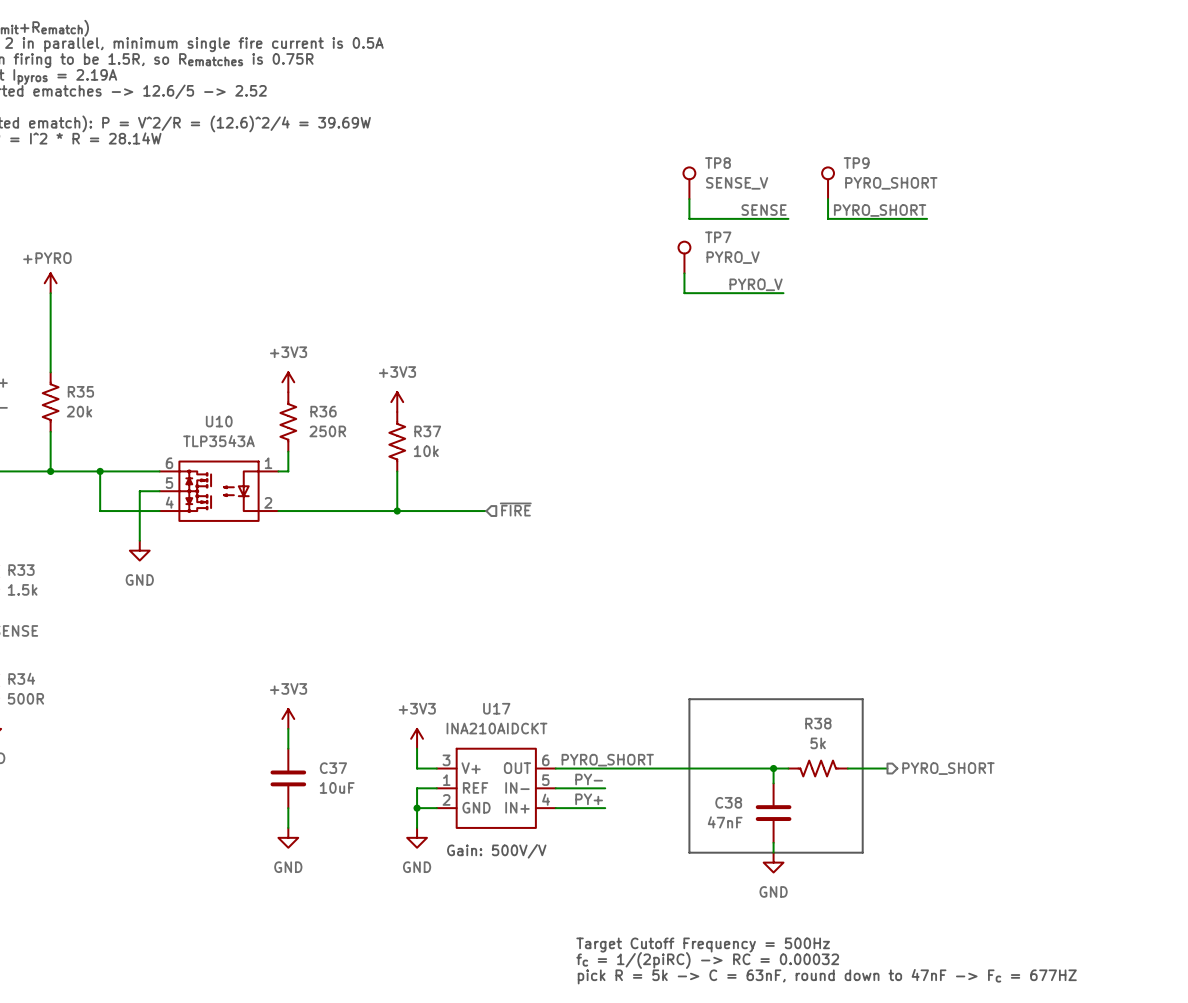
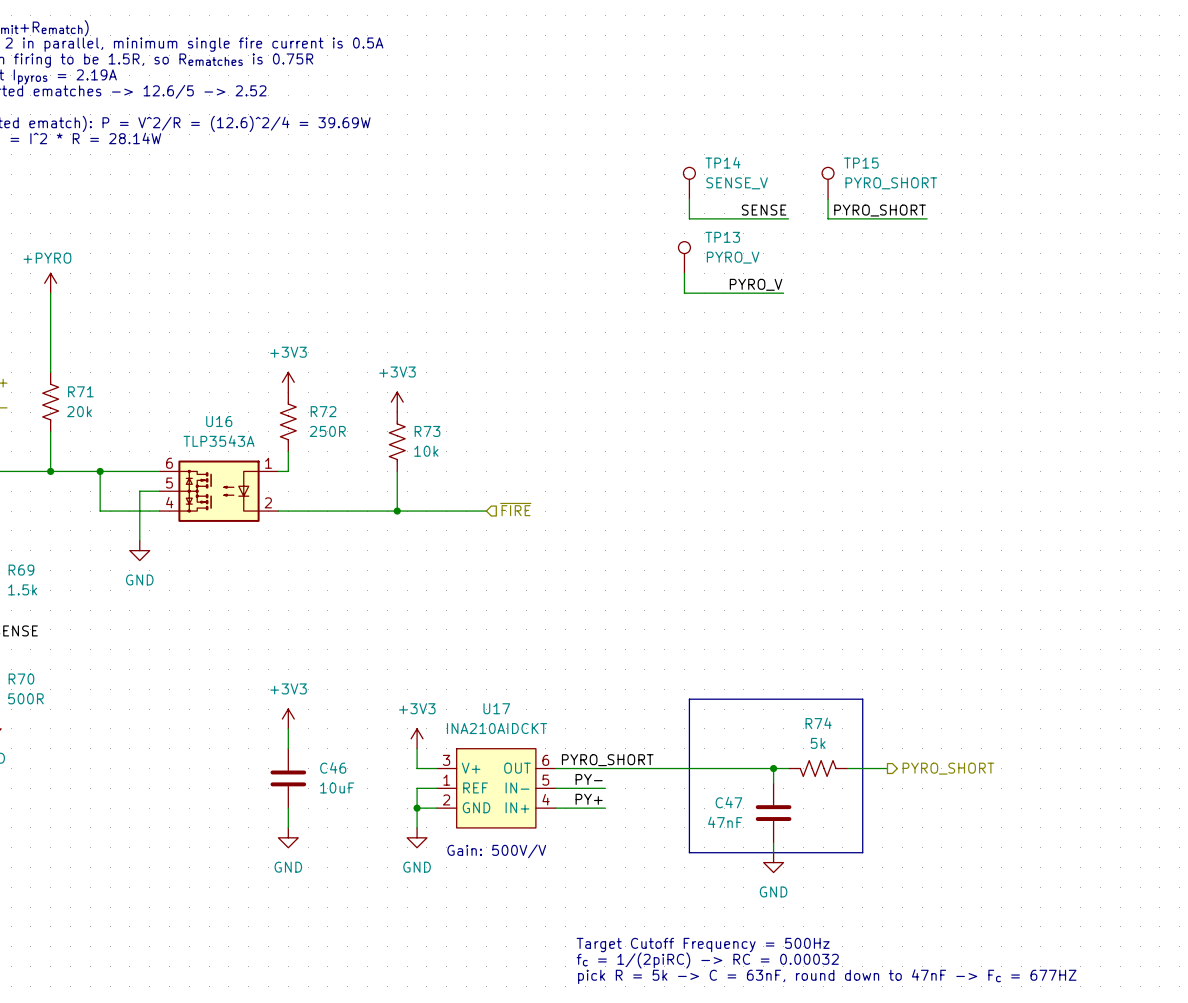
TP8 name: TP8 (718, 163) -> TP14 (722, 162)
TP9 name: TP9 (856, 163) -> TP15 (861, 163)
TP7 name: TP7 (718, 237) -> TP13 (722, 237)
R35 name: R35 (80, 391) -> R71 (80, 391)
R36 name: R36 (323, 411) -> R72 (323, 411)
U10 name: U10 (219, 421) -> U16 (219, 421)
R37 name: R37 (427, 431) -> R73 (427, 431)
R33 name: R33 (21, 570) -> R69 (21, 570)
R34 name: R34 (21, 678) -> R70 (21, 679)
R38 name: R38 (818, 723) -> R74 (818, 723)
C37 name: C37 (333, 768) -> C46 (333, 767)
C38 name: C38 (728, 802) -> C47 (728, 802)

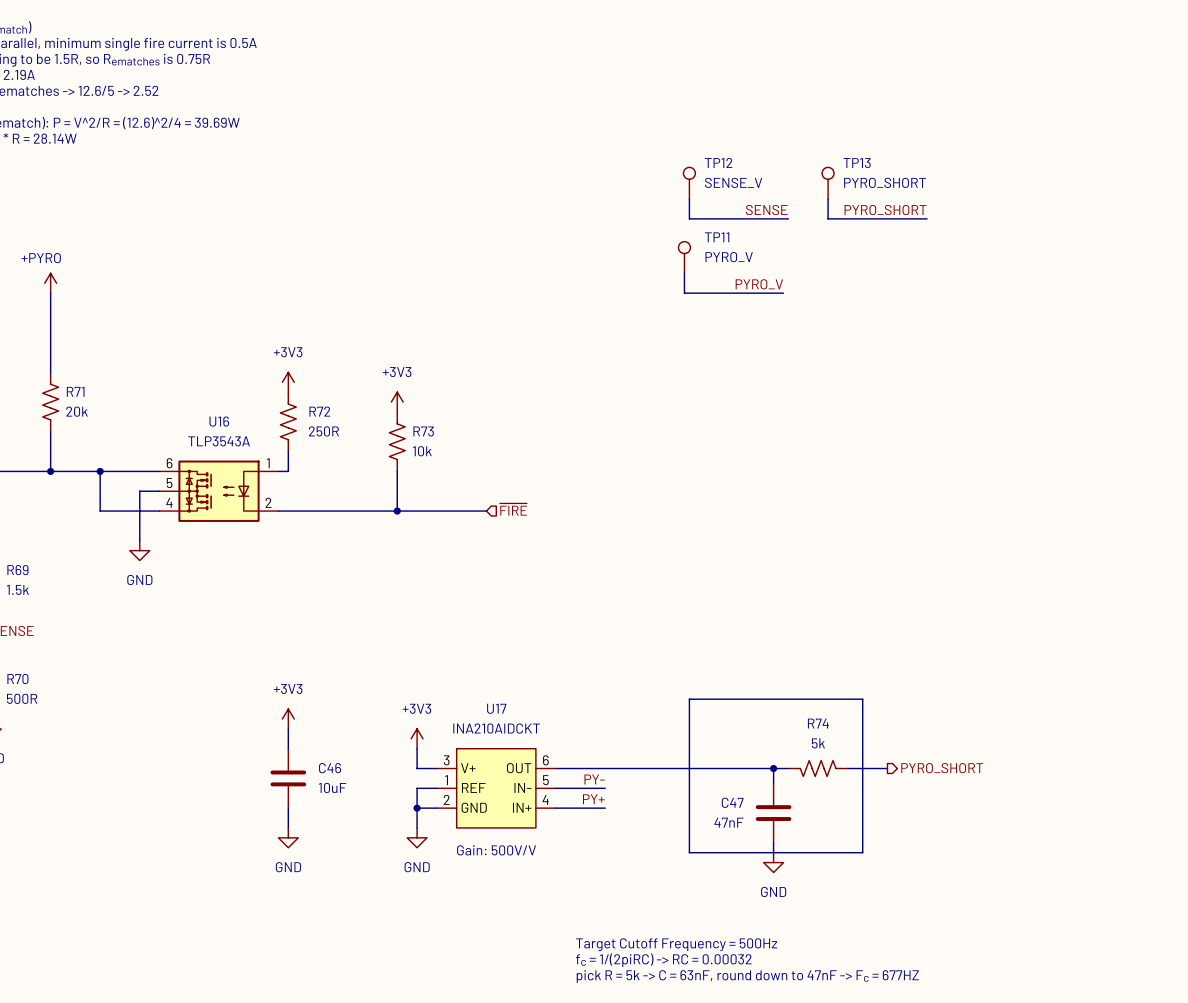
TP14 name: TP14 (722, 162) -> TP12 (718, 163)
TP15 name: TP15 (861, 163) -> TP13 (857, 163)
TP13 name: TP13 (722, 237) -> TP11 (717, 237)
label: PYRO_SHORT (607, 760) -> none

